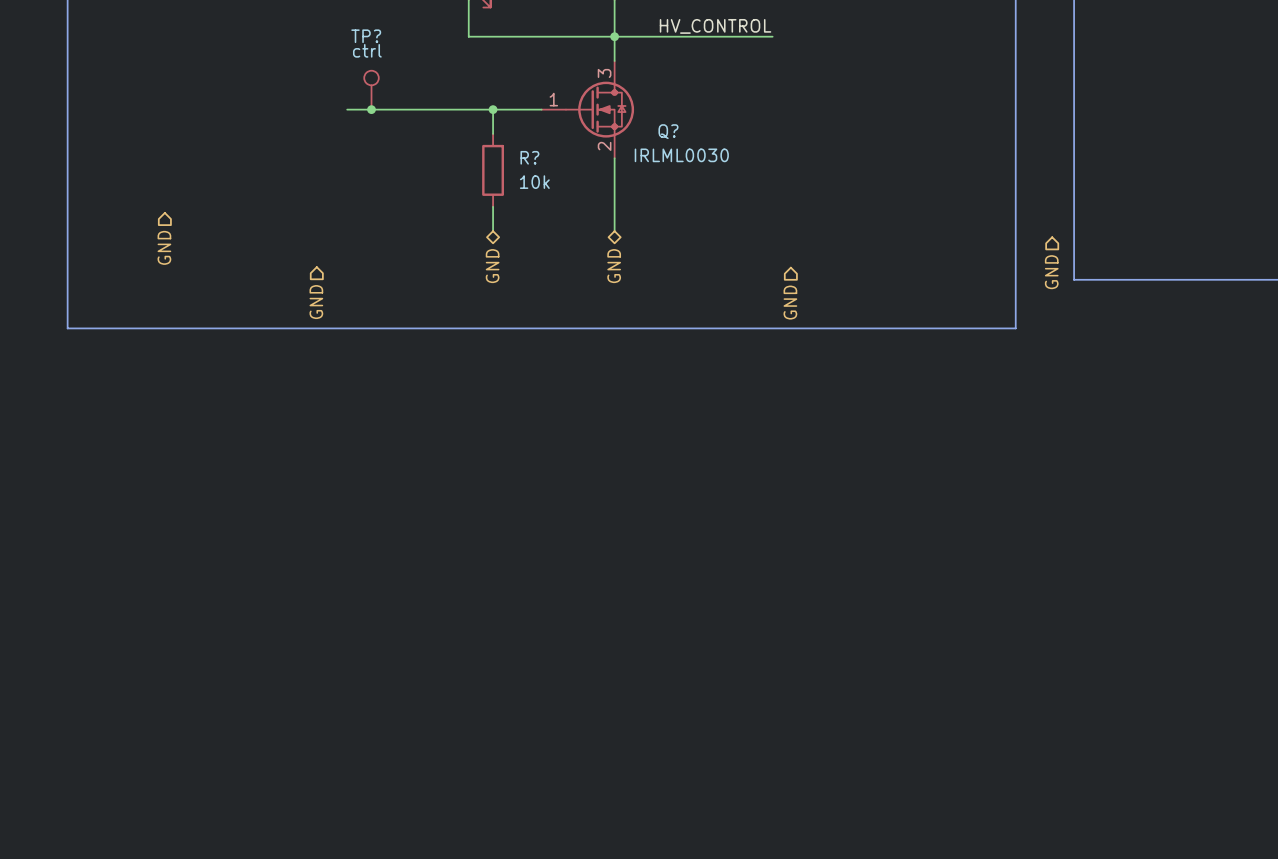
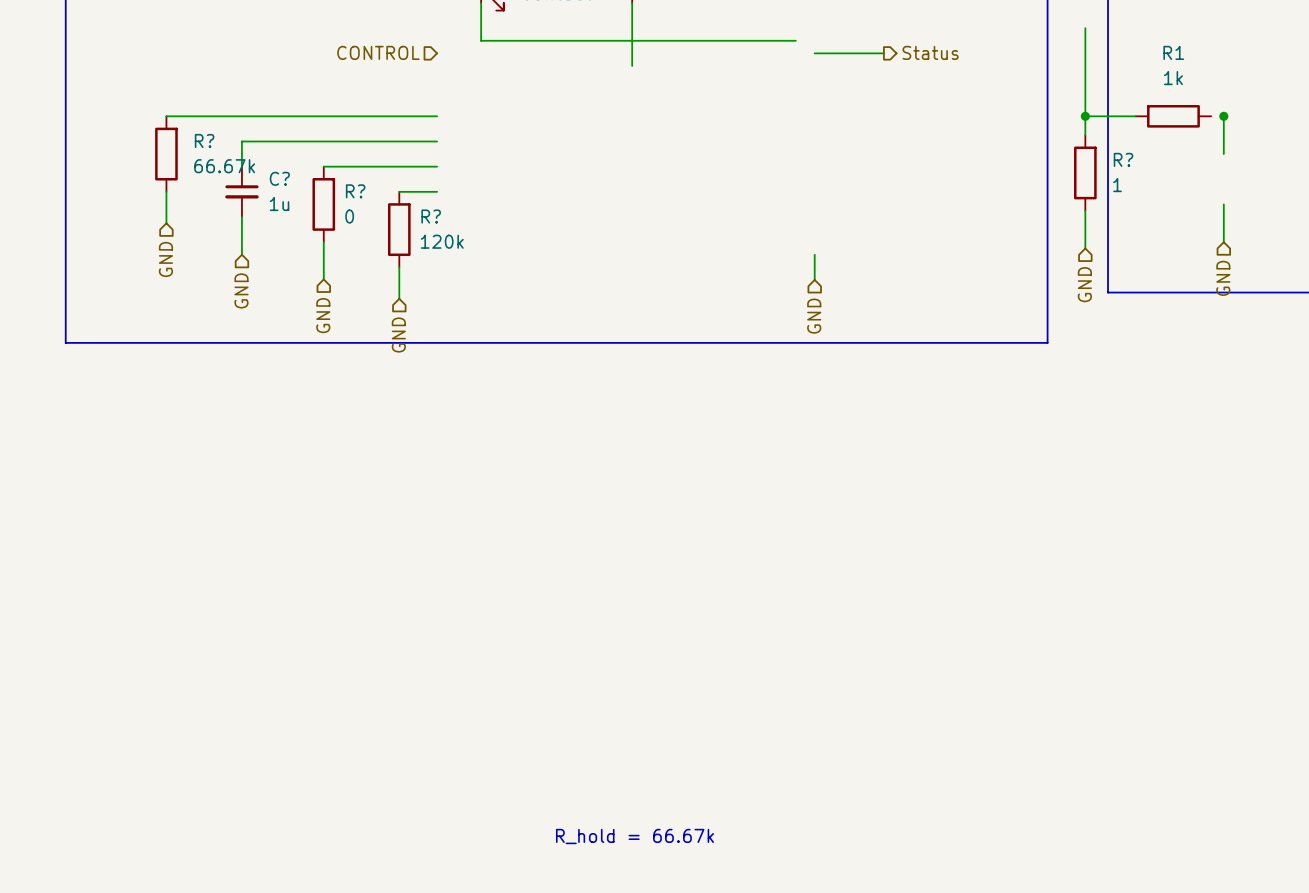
wire: none -> (1085, 28) (1085, 135)
label: HV_CONTROL (715, 26) -> none
junction: (614, 36) -> none
hierarchical label: none -> CONTROL (378, 52)
wire: none -> (814, 53) (883, 53)
hierarchical label: none -> Status (930, 52)
TP?: ctrl (371, 90) -> none
wire: none -> (166, 116) (355, 116)
junction: (371, 109) -> none
wire: (426, 109) (541, 109) -> none
wire: (493, 109) (493, 133) -> none
junction: (493, 109) -> none
Q?: IRLML0030 (587, 109) -> none
wire: none -> (1085, 116) (1135, 116)
junction: none -> (1085, 116)
R1: none -> 1k (1173, 116)
wire: none -> (1223, 116) (1223, 154)
junction: none -> (1223, 116)
wire: none -> (437, 141) (241, 141) (241, 166)
R?: none -> 66.67k (166, 154)
wire: none -> (323, 166) (437, 166)
wire: (614, 158) (614, 231) -> none
R?: none -> 1 (1085, 172)
R?: 10k (493, 170) -> none
wire: none -> (166, 191) (166, 223)
C?: none -> 1u (241, 191)
wire: none -> (399, 191) (437, 191)
R?: none -> 0 (323, 204)
wire: none -> (1223, 204) (1223, 242)
wire: none -> (1085, 210) (1085, 248)
wire: none -> (241, 217) (241, 254)
wire: (493, 206) (493, 231) -> none
R?: none -> 120k (399, 229)
wire: none -> (323, 242) (323, 279)
wire: none -> (814, 254) (814, 279)
wire: none -> (399, 267) (399, 298)
hierarchical label: GND (492, 266) -> none
hierarchical label: GND (614, 266) -> none
hierarchical label: none -> GND (1223, 278)
hierarchical label: none -> GND (241, 290)
hierarchical label: none -> GND (398, 335)
text: none -> R_hold = 66.67k (635, 836)

